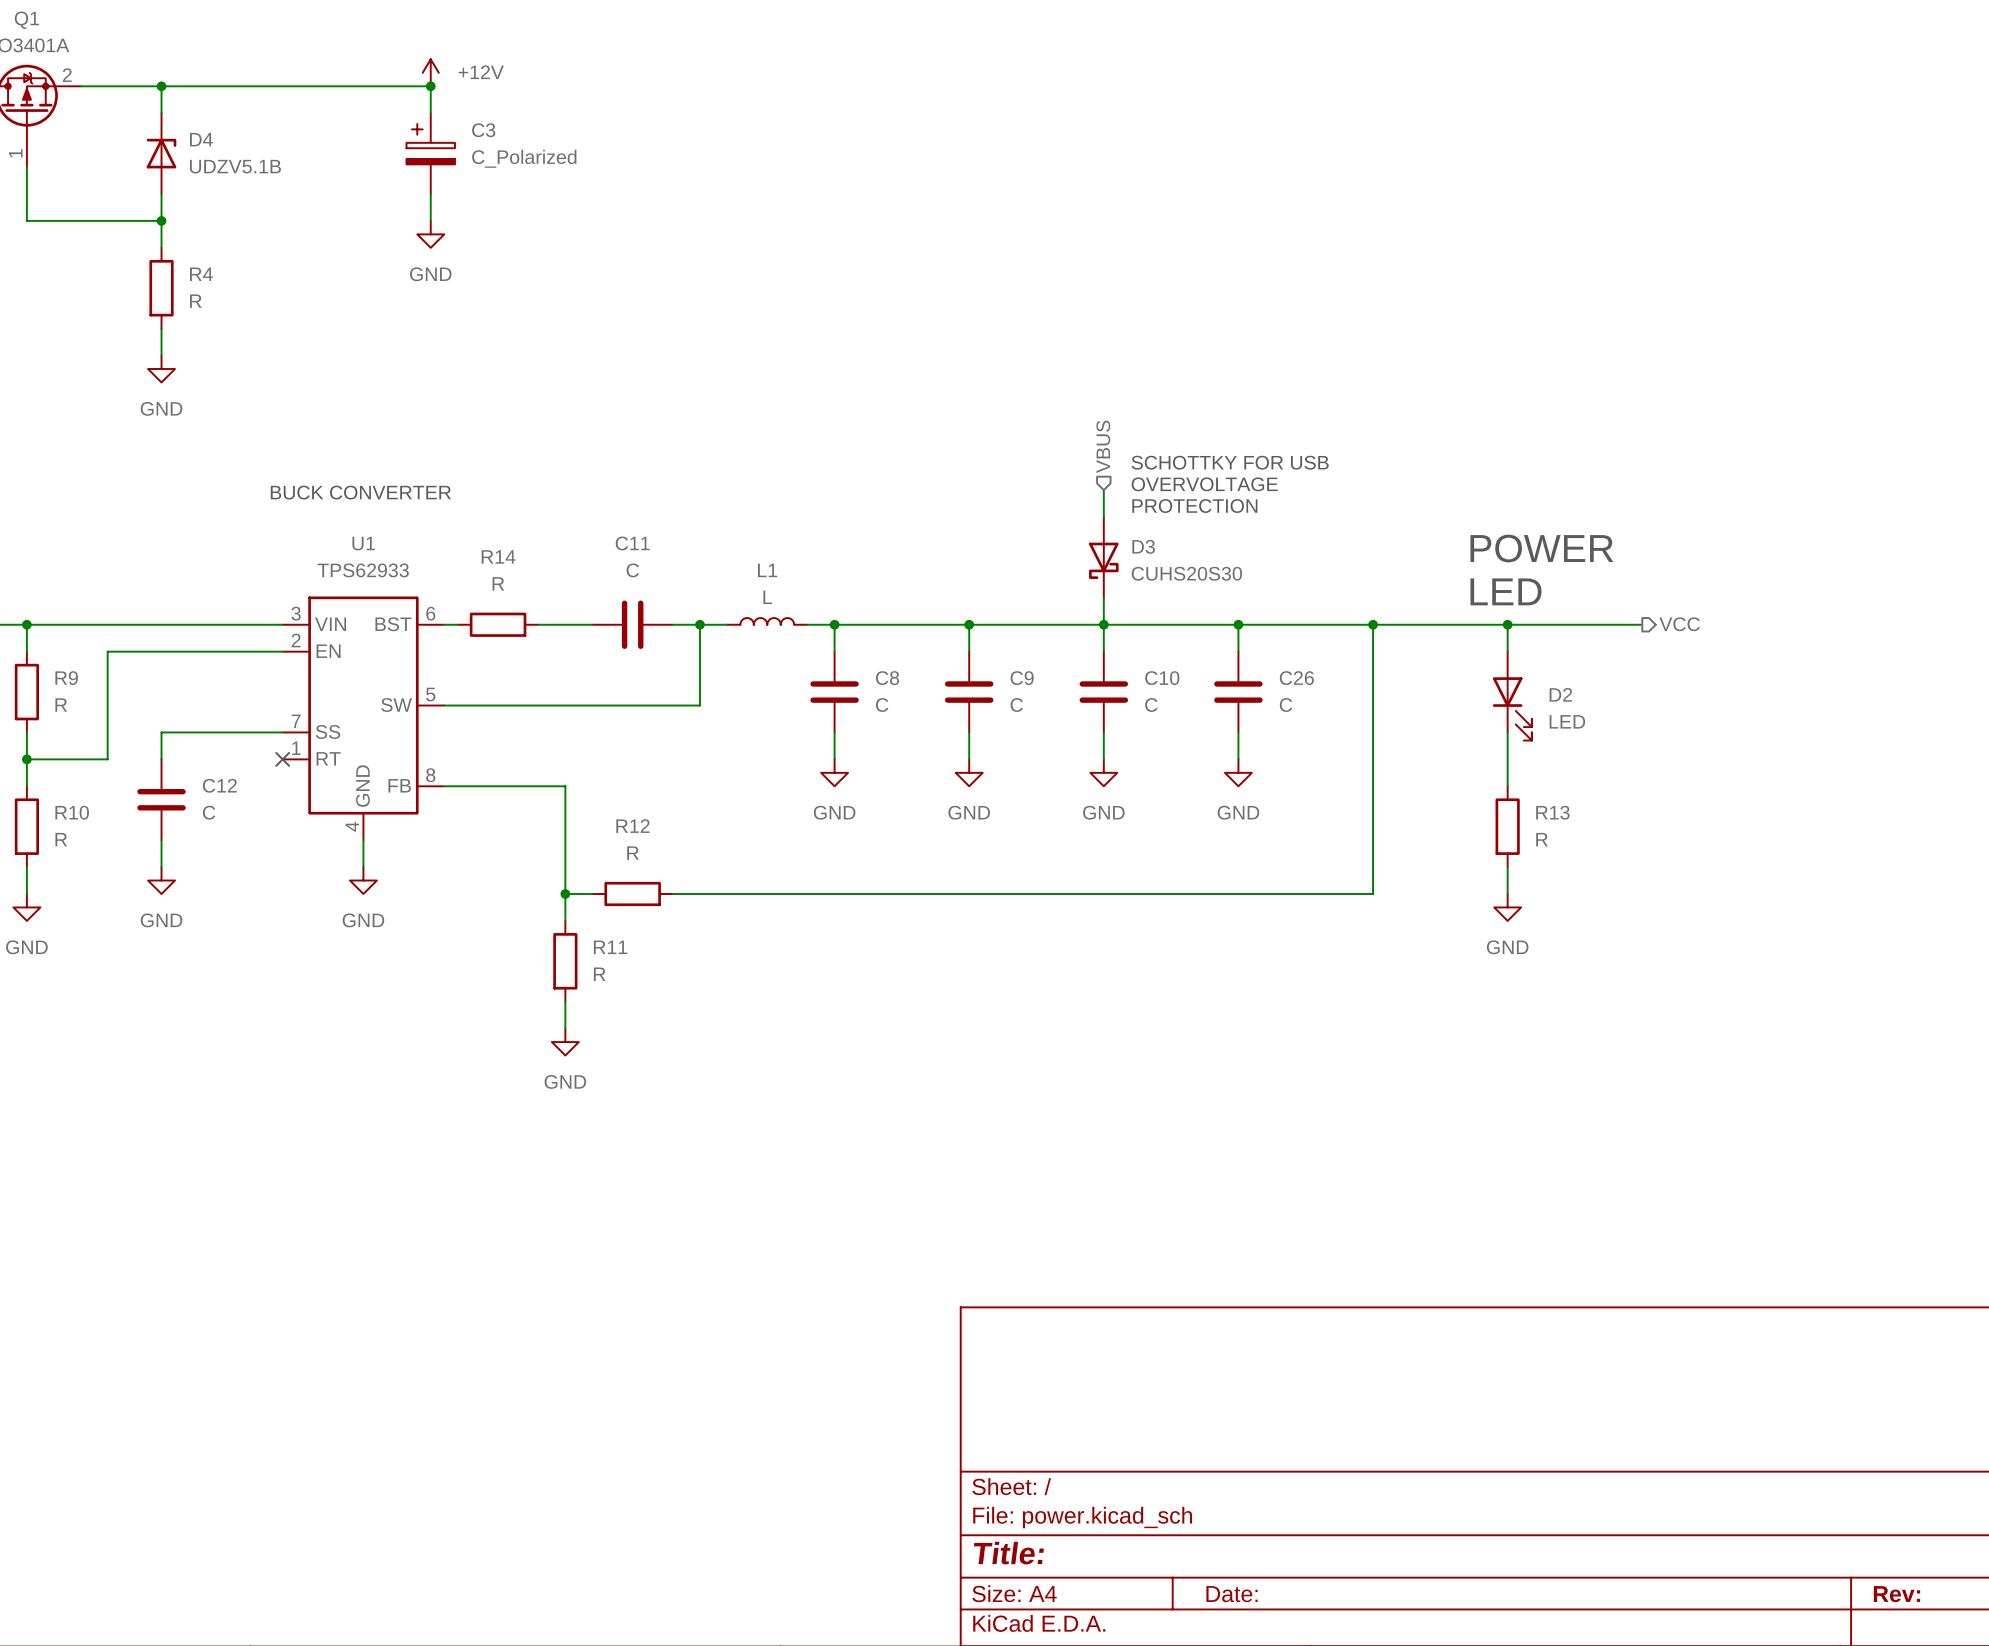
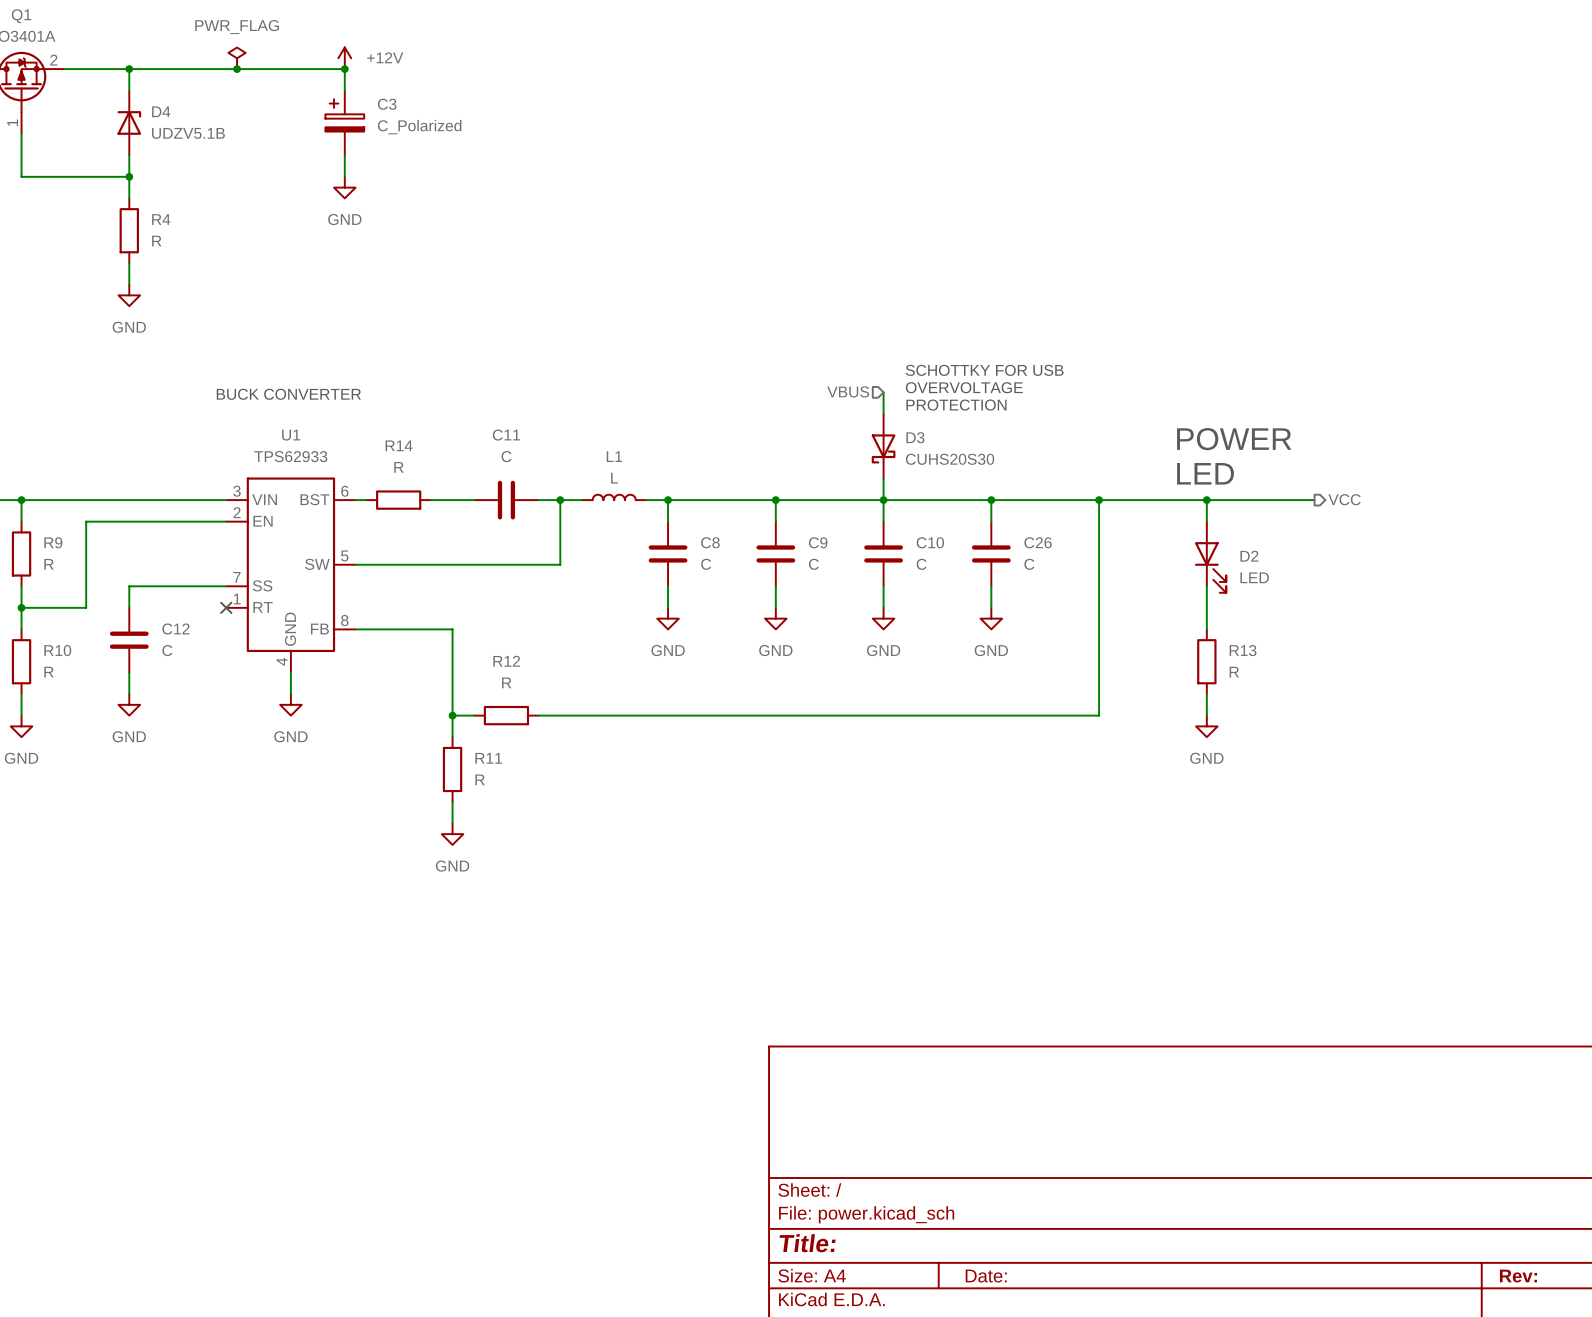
power symbol: none -> PWR_FLAG (237, 58)
junction: none -> (237, 69)
hierarchical label rotation: 0° (1103, 446) -> 90° counterclockwise (848, 391)
hierarchical label position: VBUS (1103, 446) -> VBUS (848, 391)

